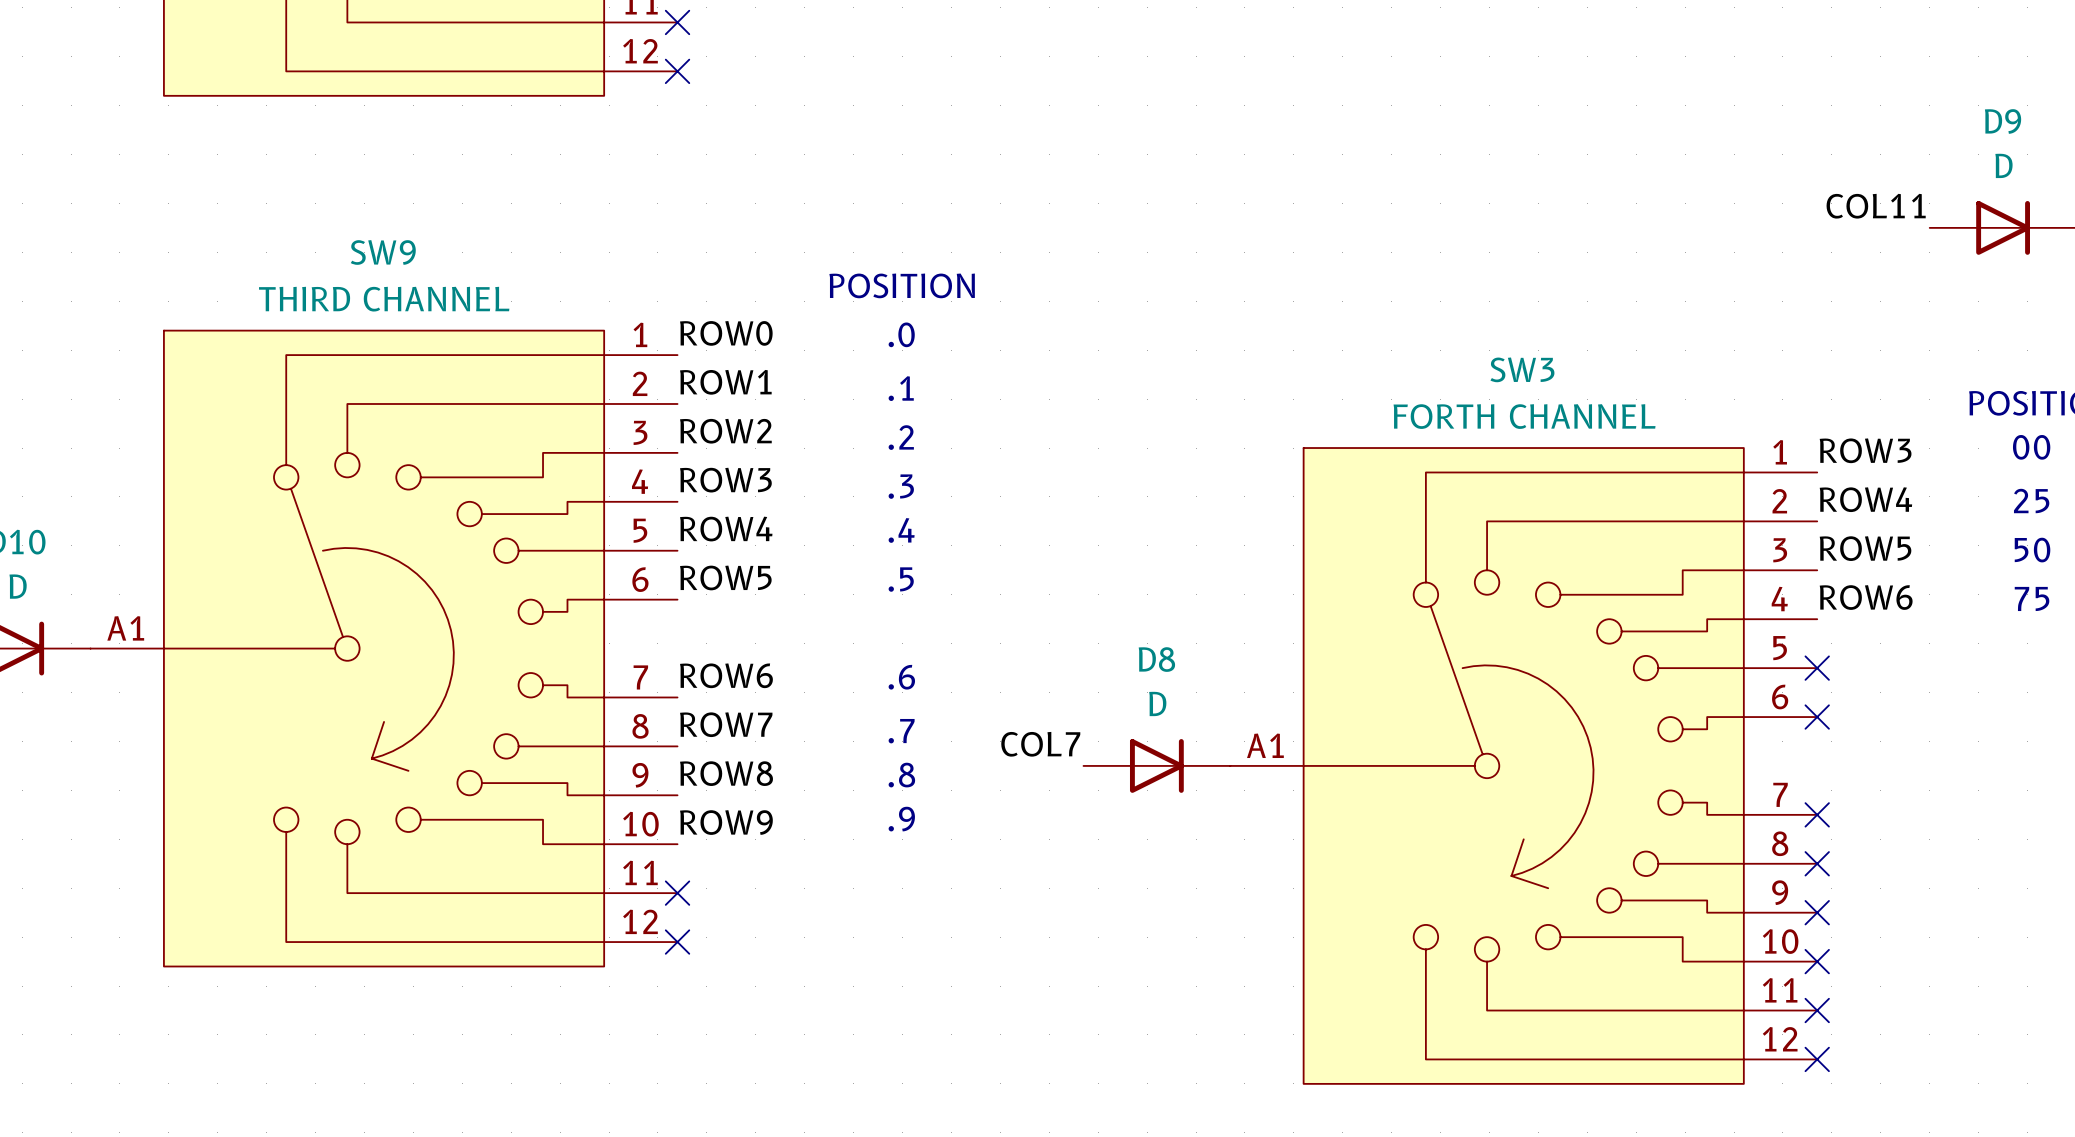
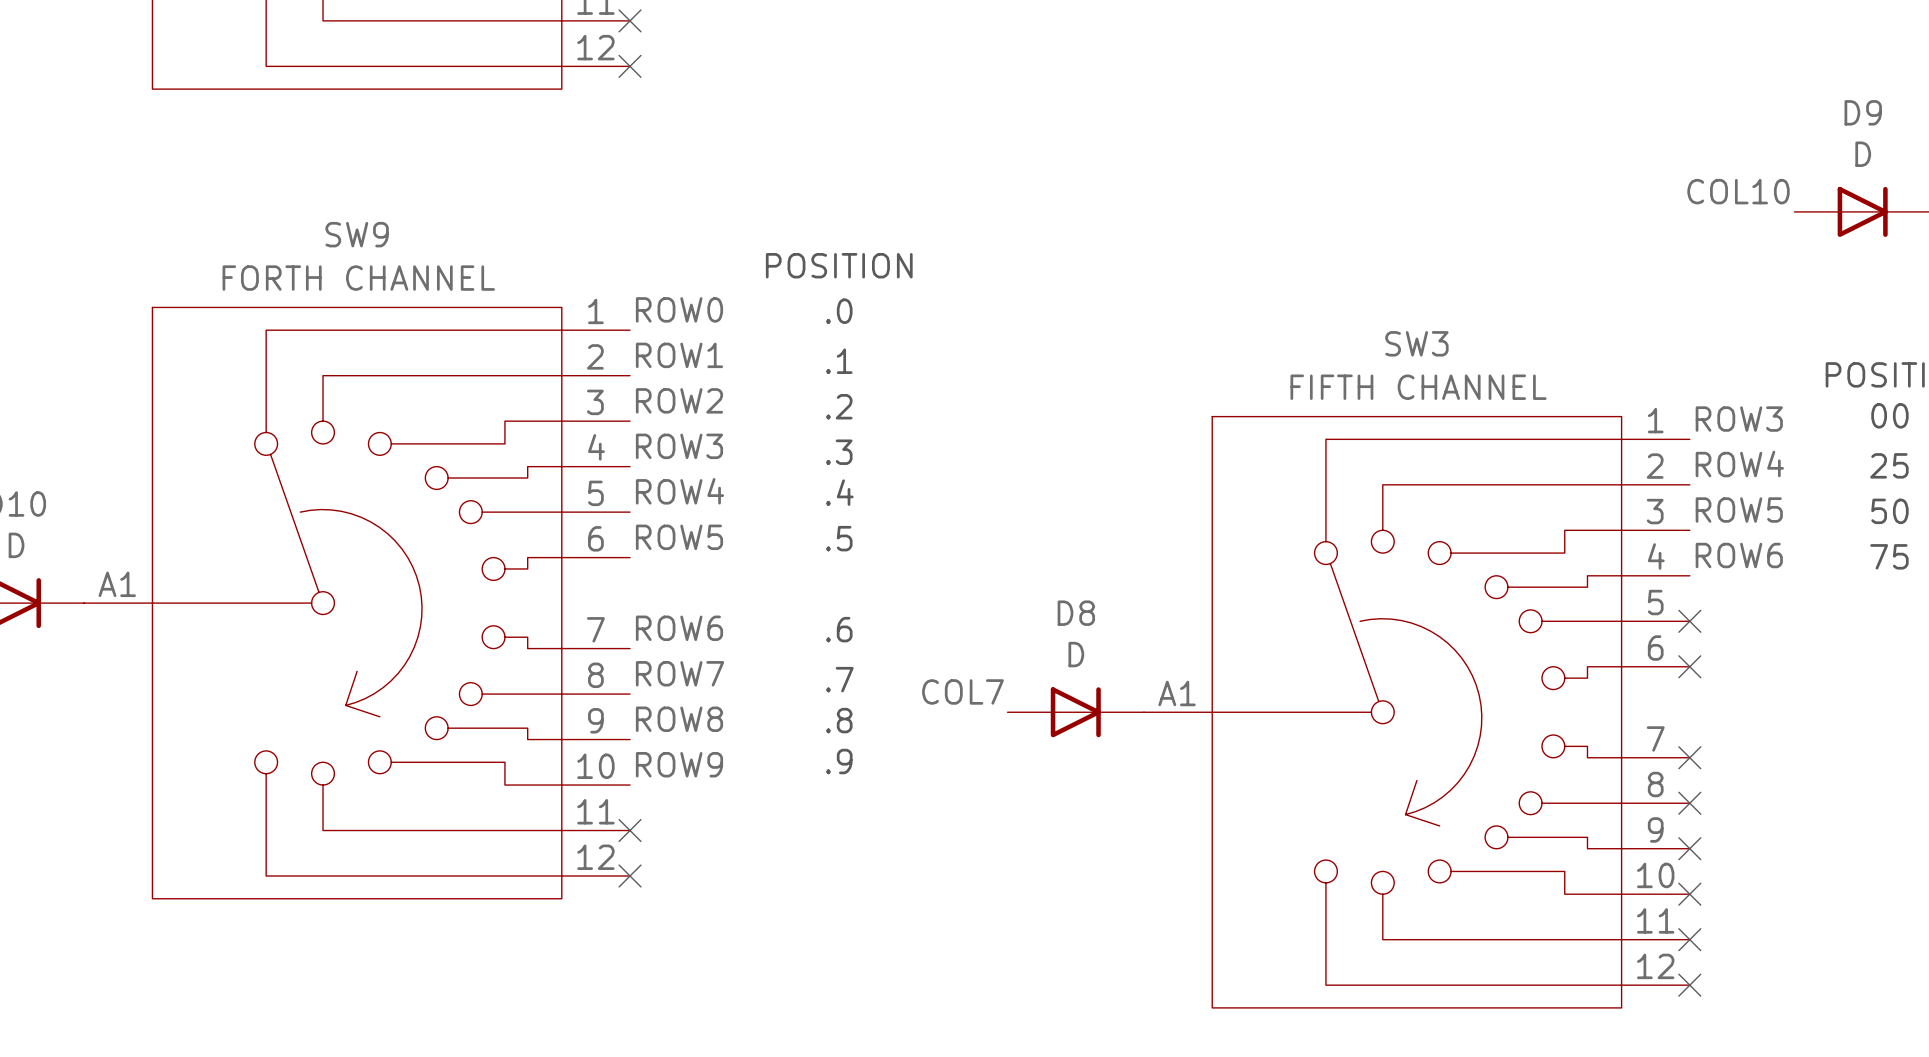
label: COL11 (1876, 206) -> COL10 (1738, 191)
SW9 value: THIRD CHANNEL (384, 299) -> FORTH CHANNEL (358, 278)
SW3 value: FORTH CHANNEL (1524, 416) -> FIFTH CHANNEL (1418, 387)

